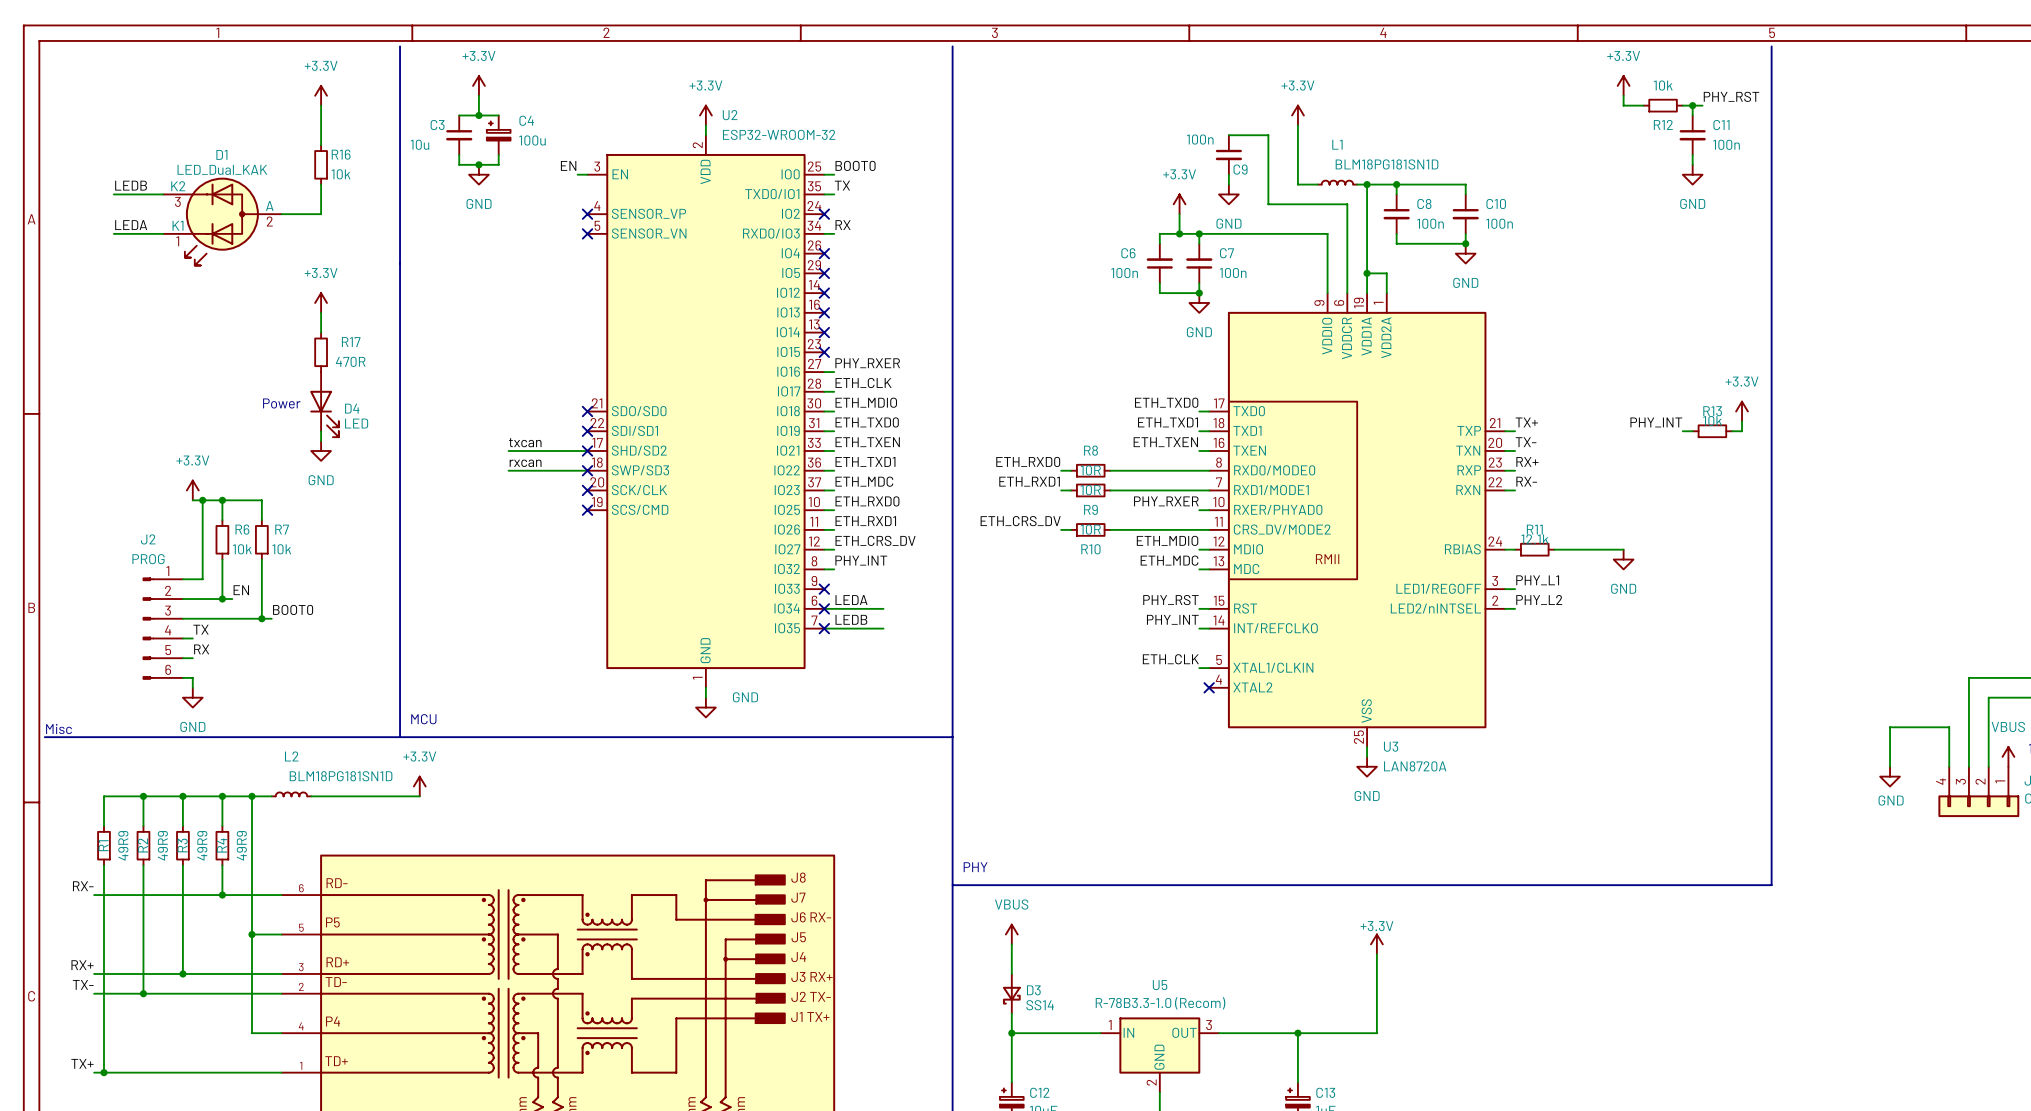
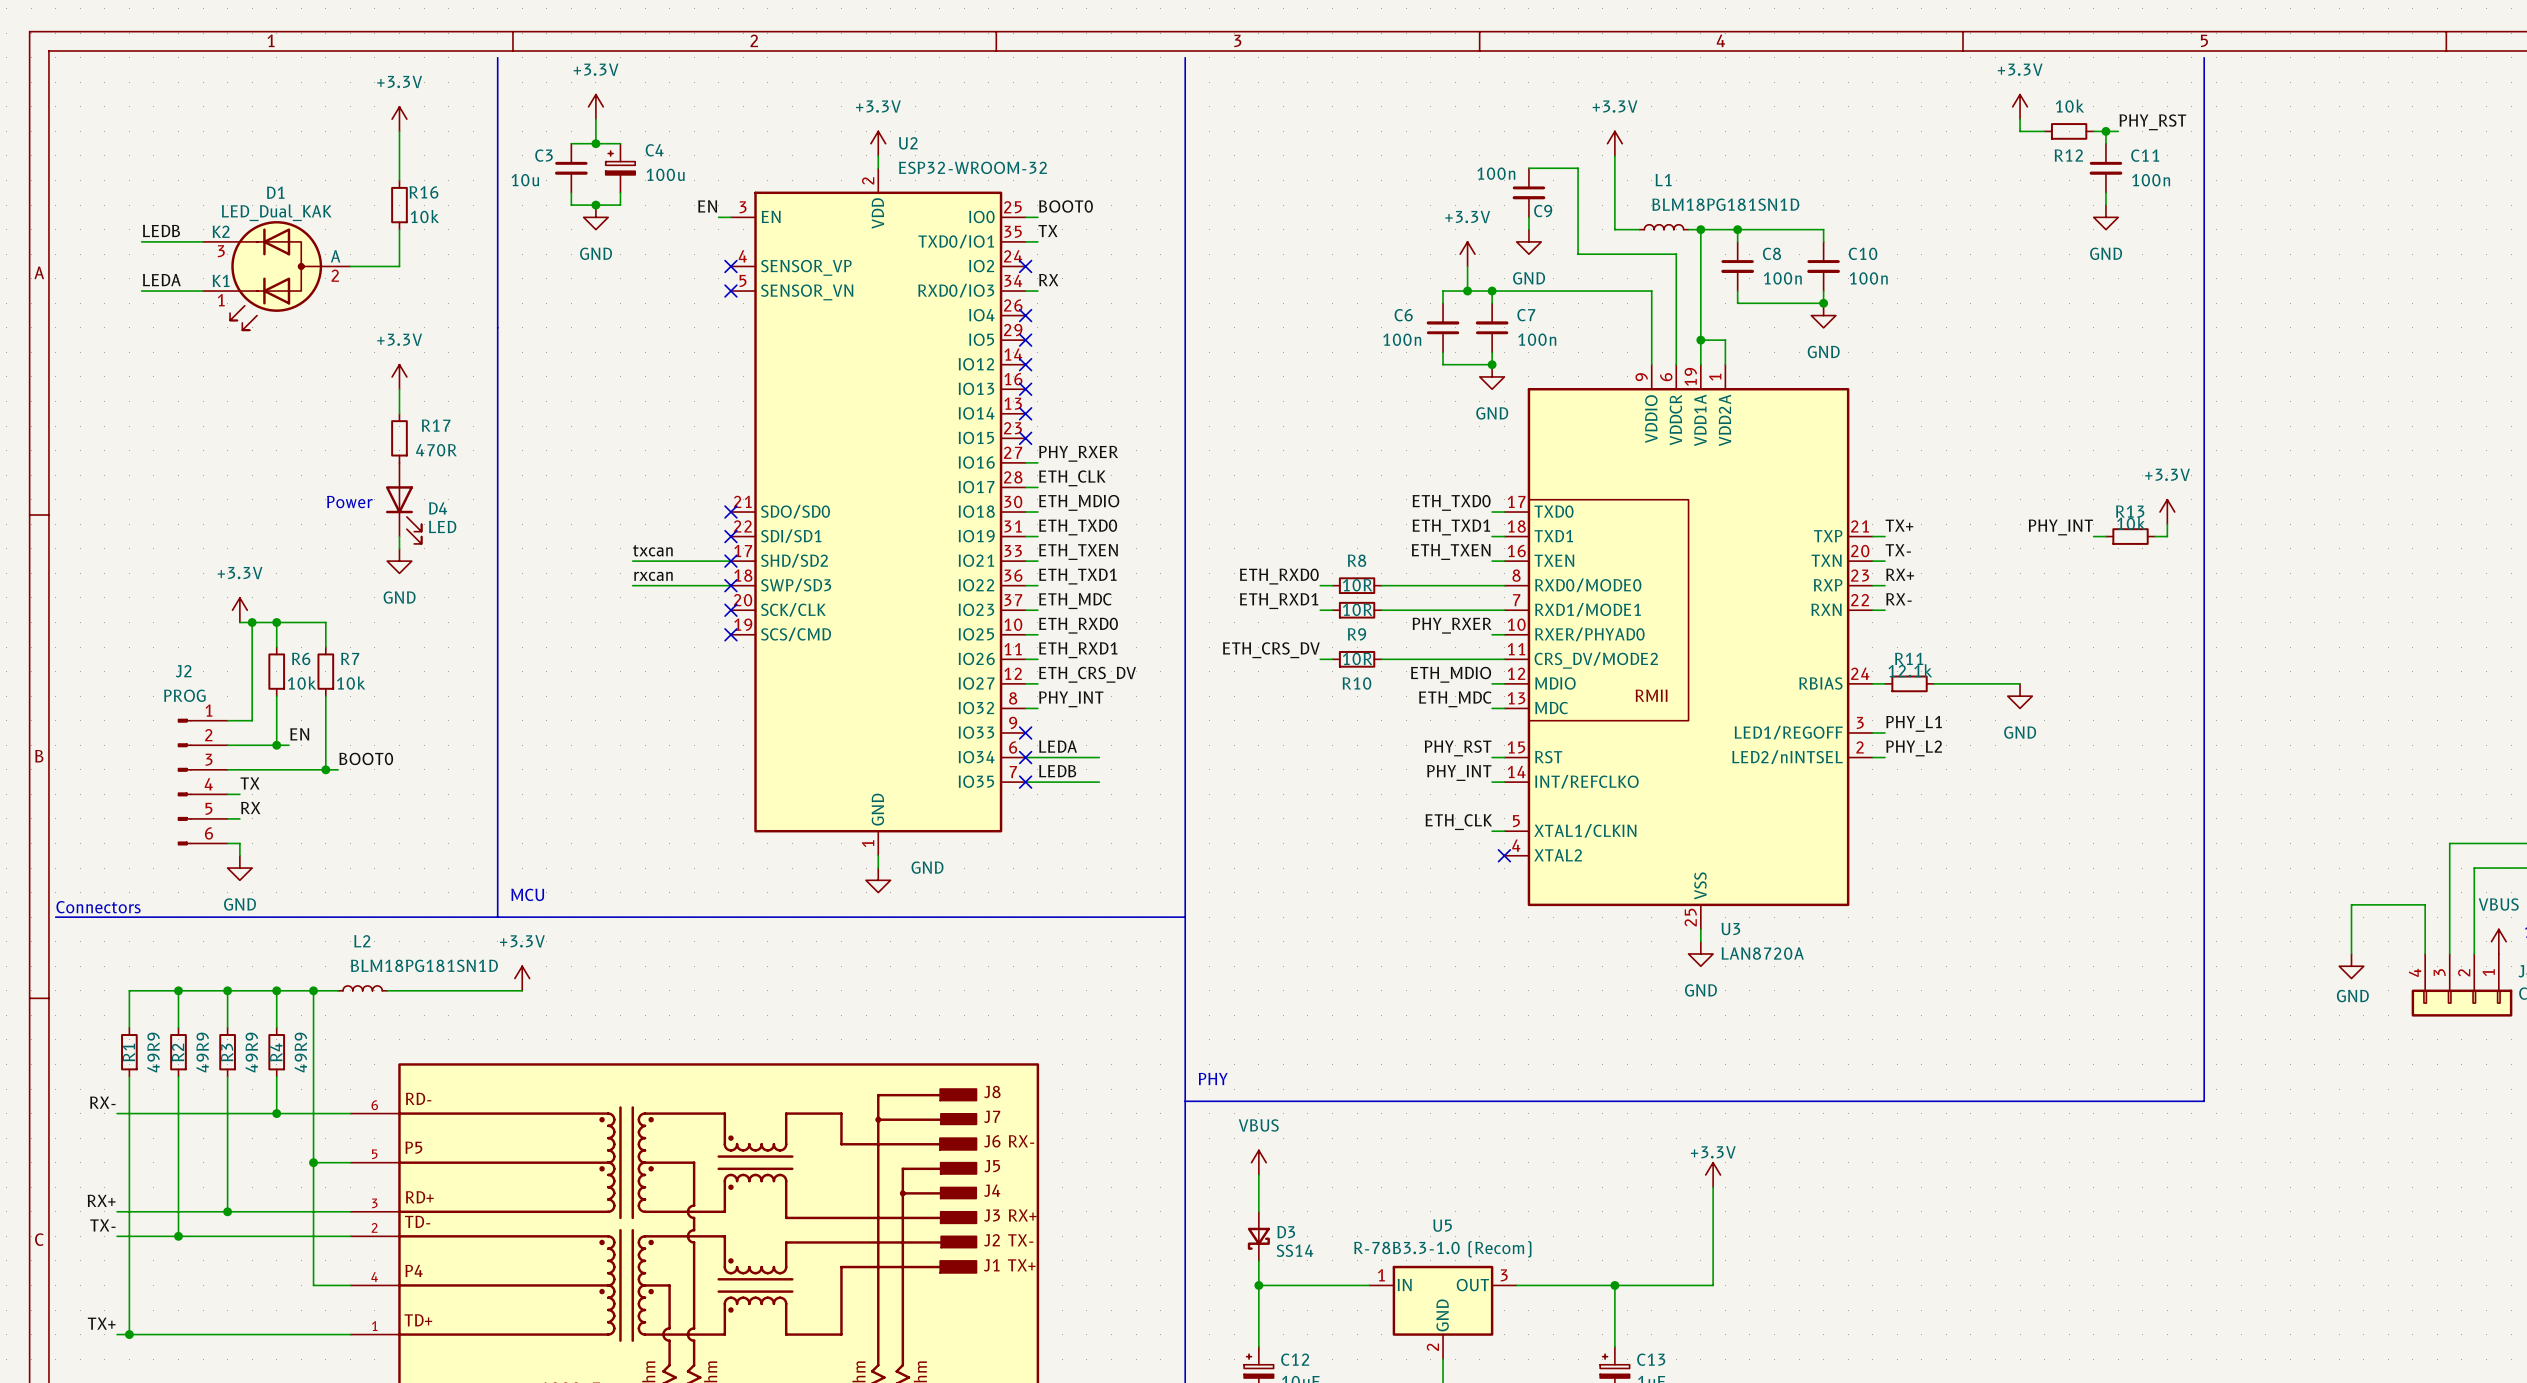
text: Misc (59, 729) -> Connectors (98, 907)

